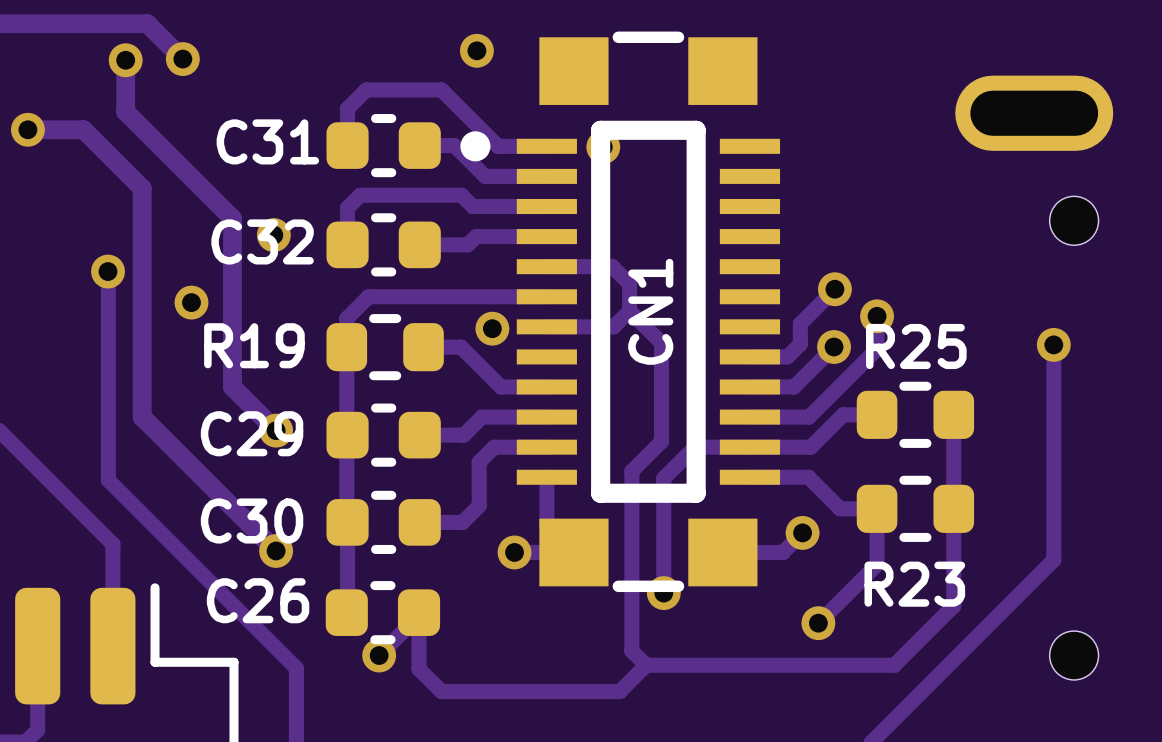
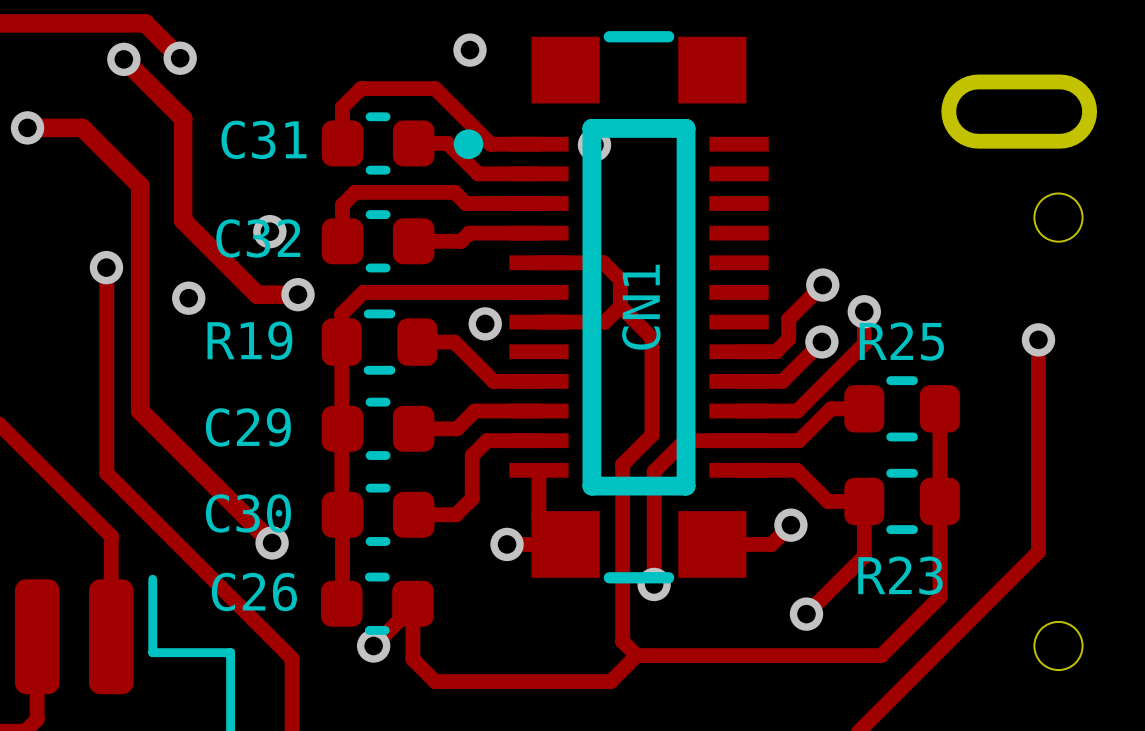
track: (125, 60) (125, 111) (232, 218) (232, 387) (276, 430) -> (123, 59) (183, 118) (183, 220) (257, 294) (298, 294)
via position: (276, 430) -> (298, 294)

